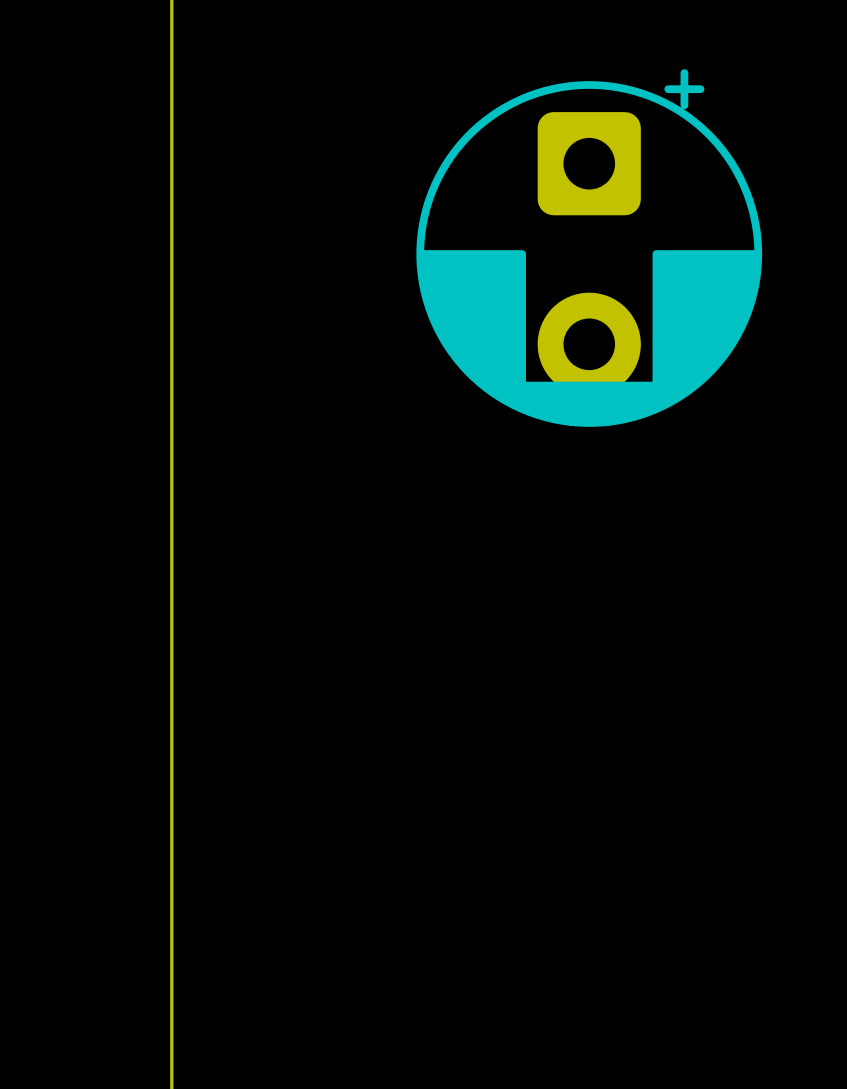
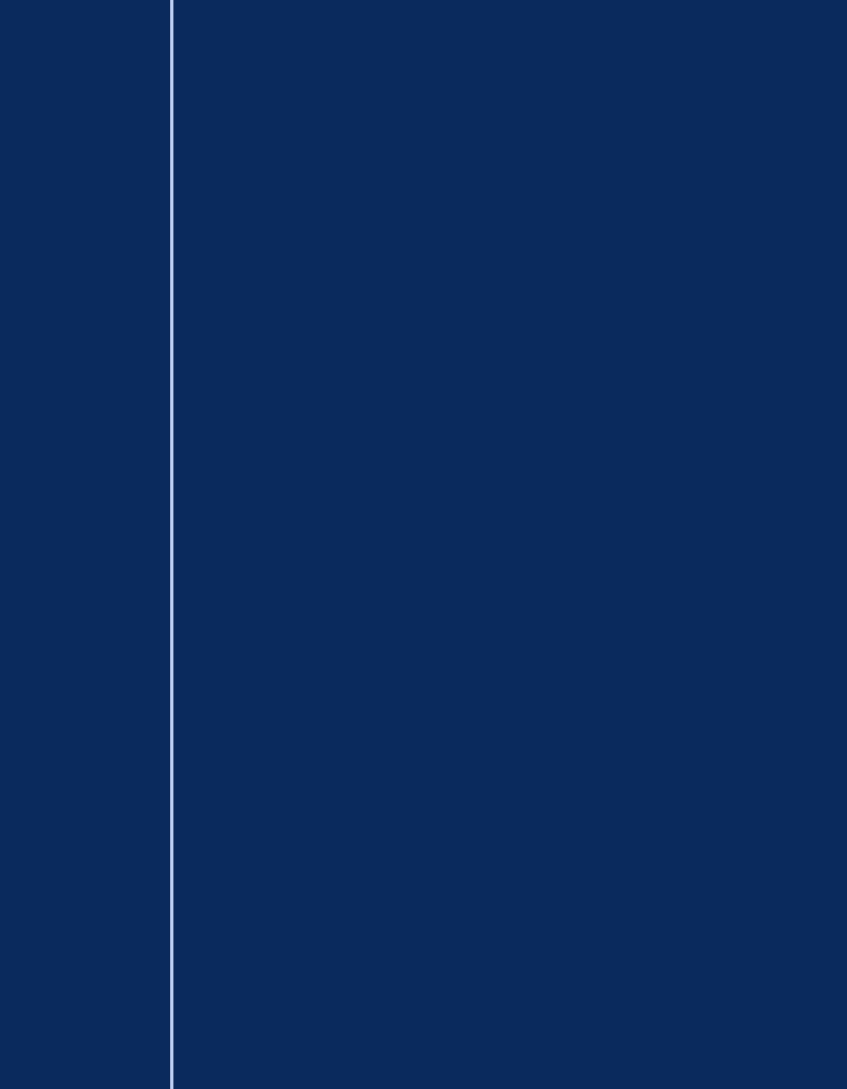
part: (589, 248) -> none

